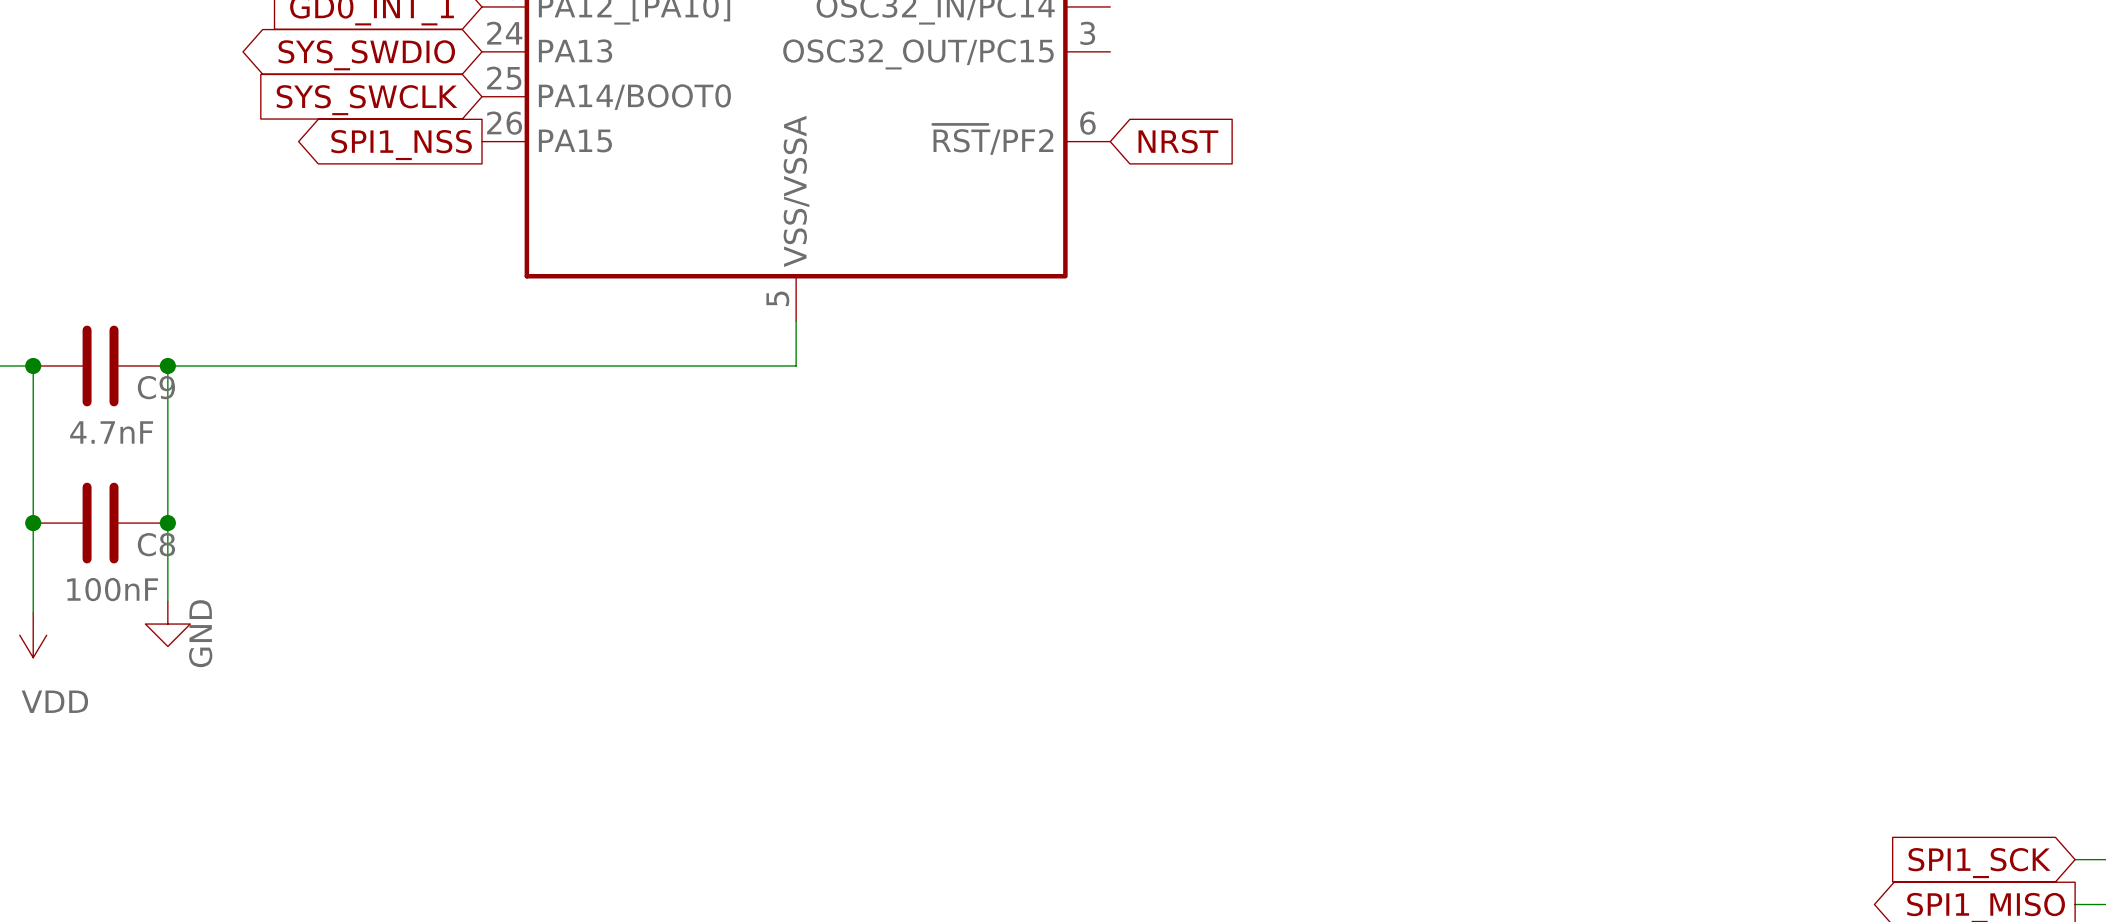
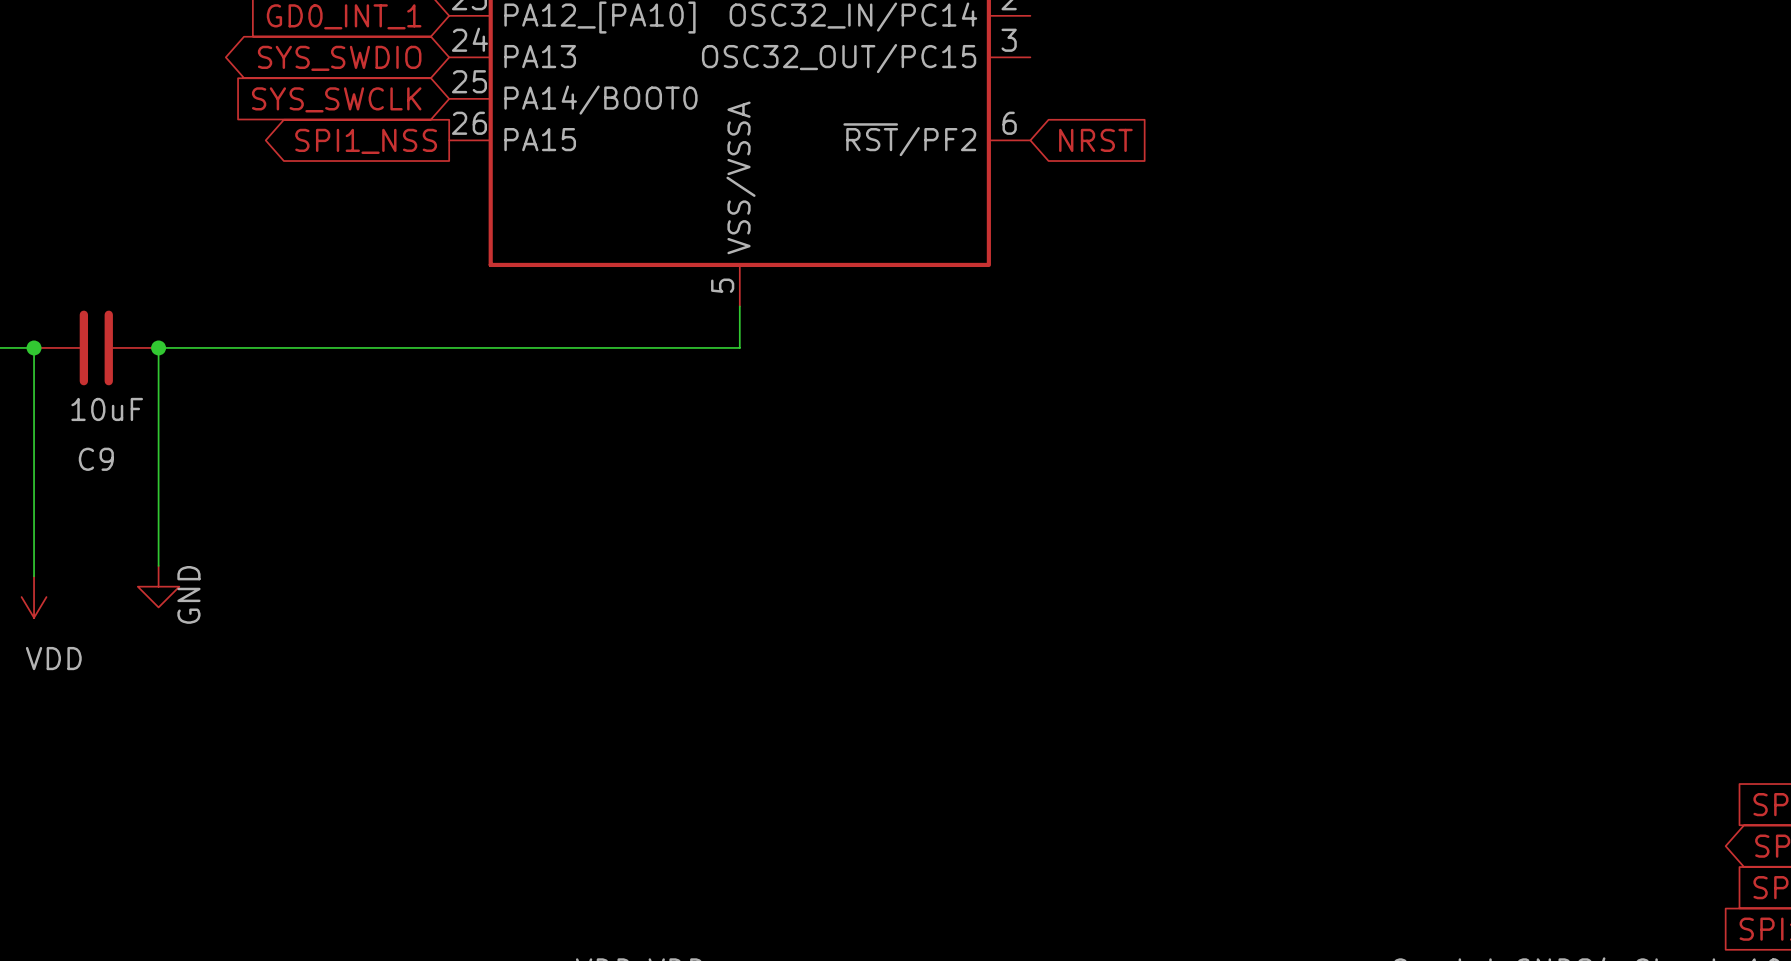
C9 name position: C9 (156, 387) -> C9 (96, 459)
C9 value: 4.7nF (111, 432) -> 10uF (107, 409)
junction: (33, 523) -> none
C8: 100nF (100, 523) -> none
junction: (167, 523) -> none

